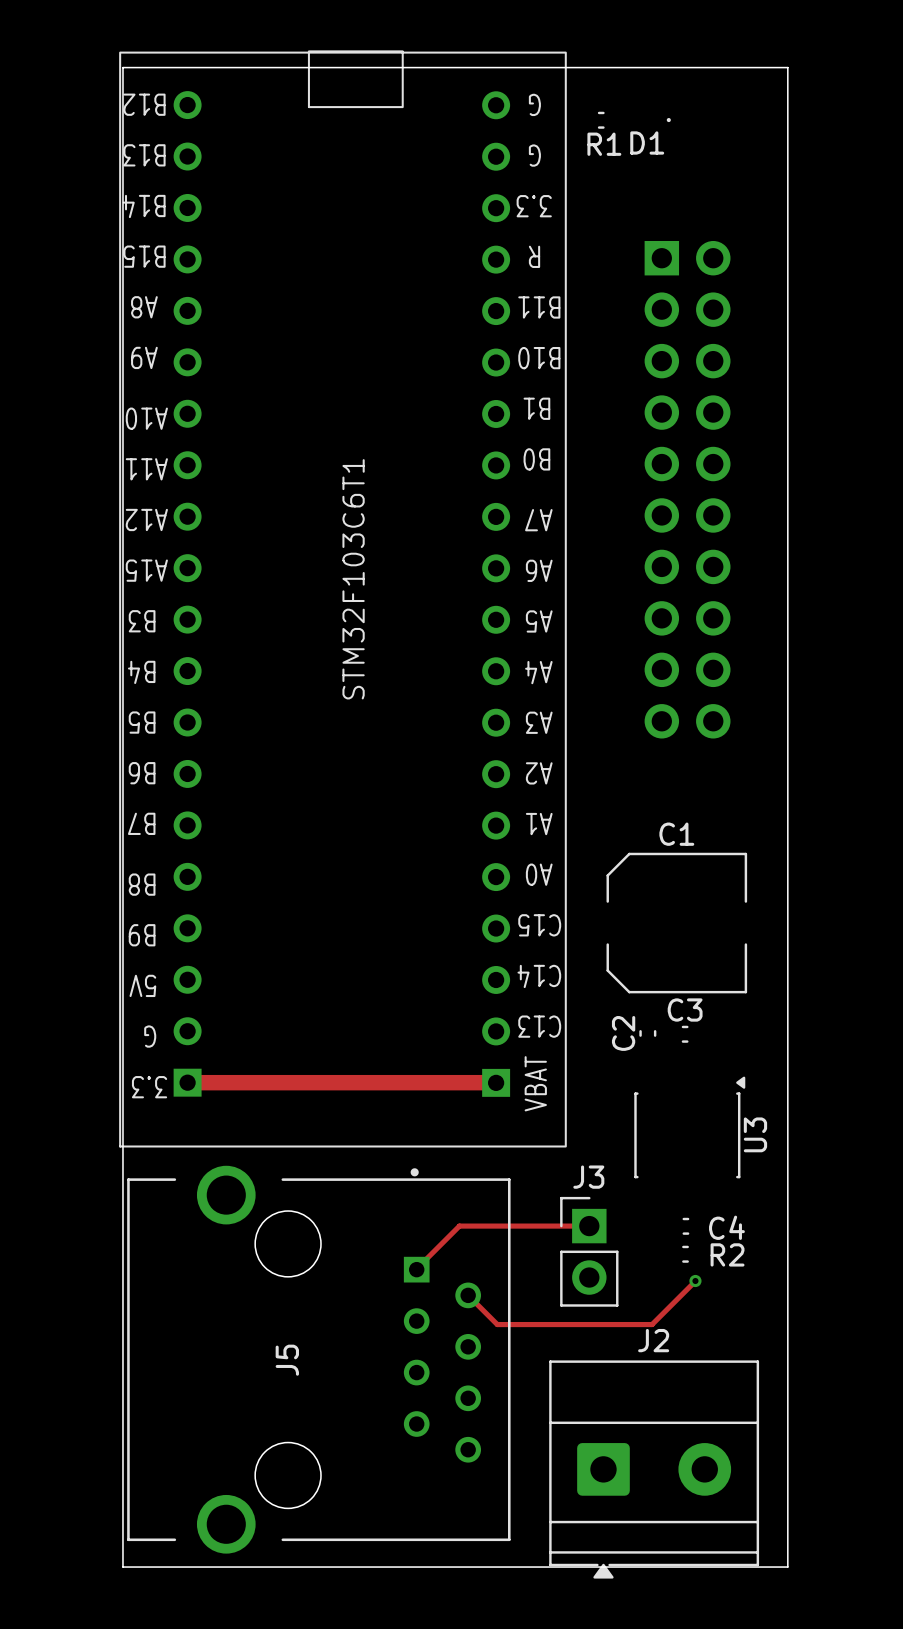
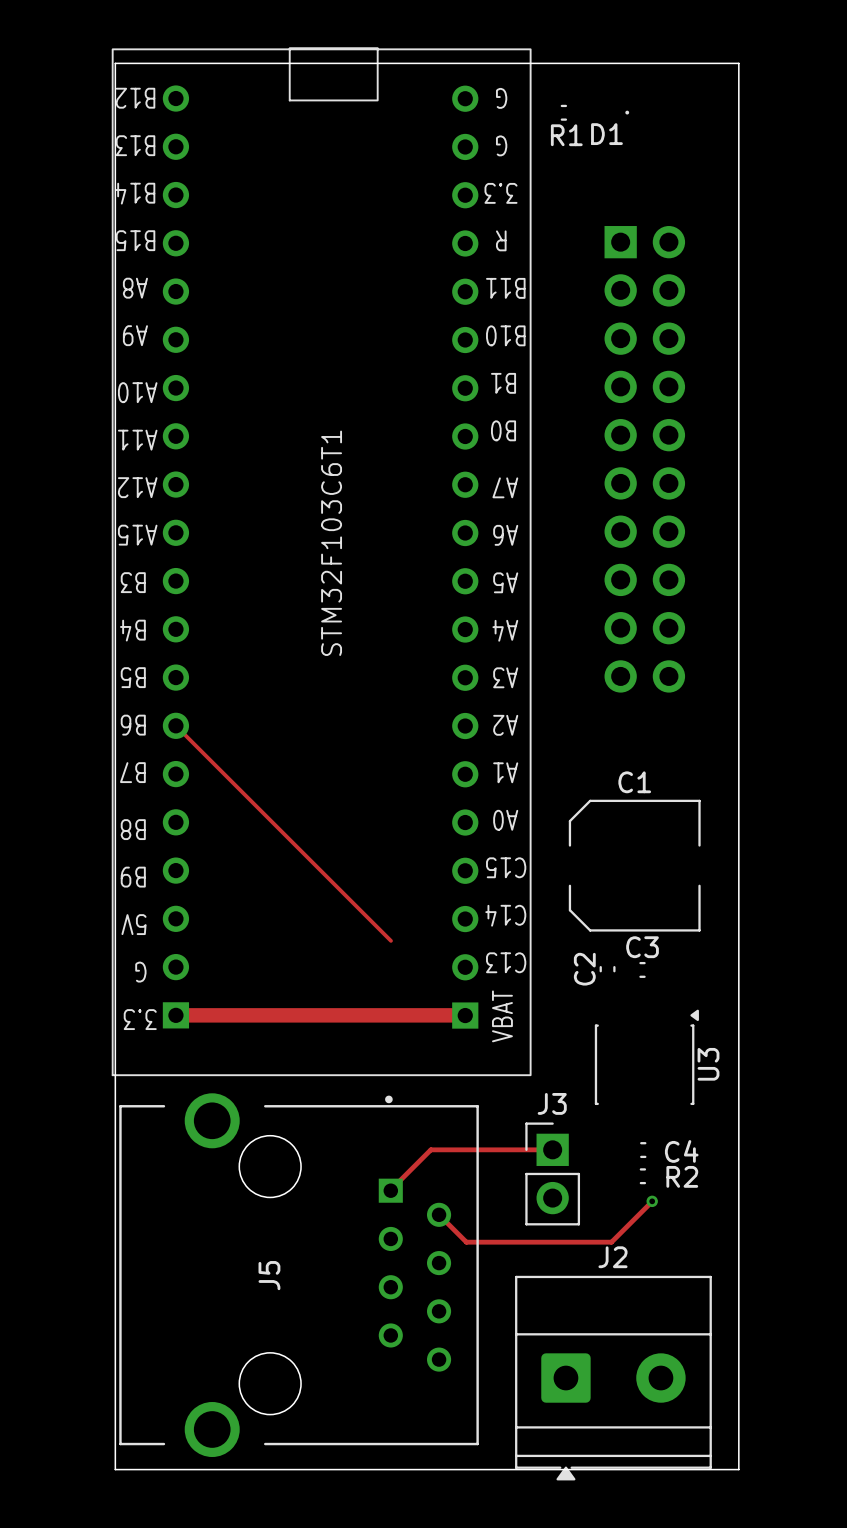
track: none -> (175, 725) (390, 940)

